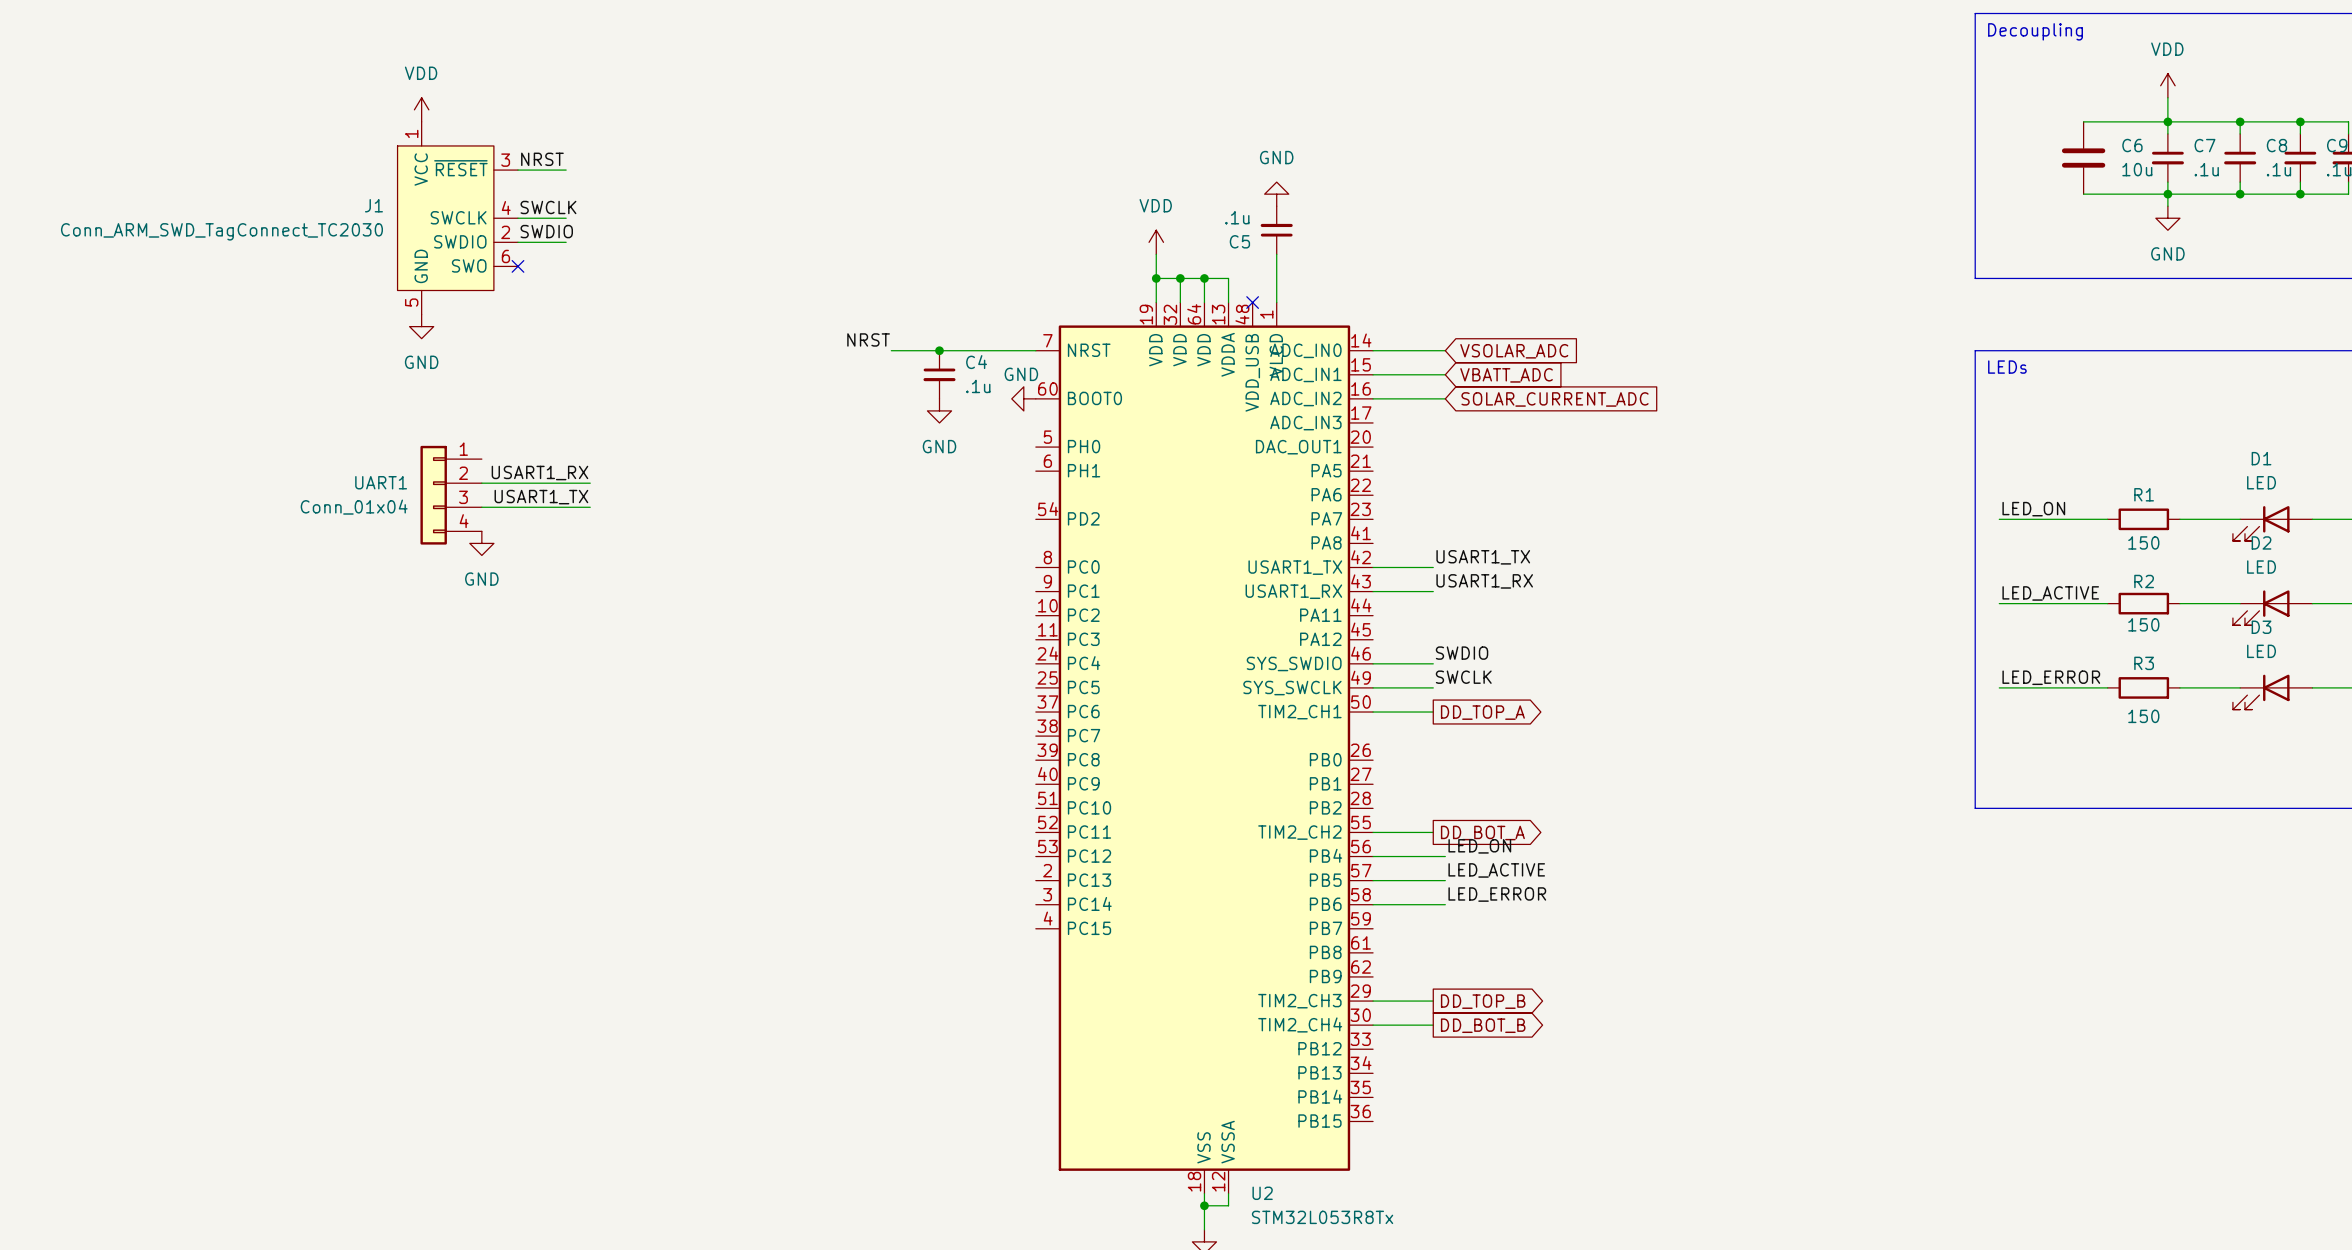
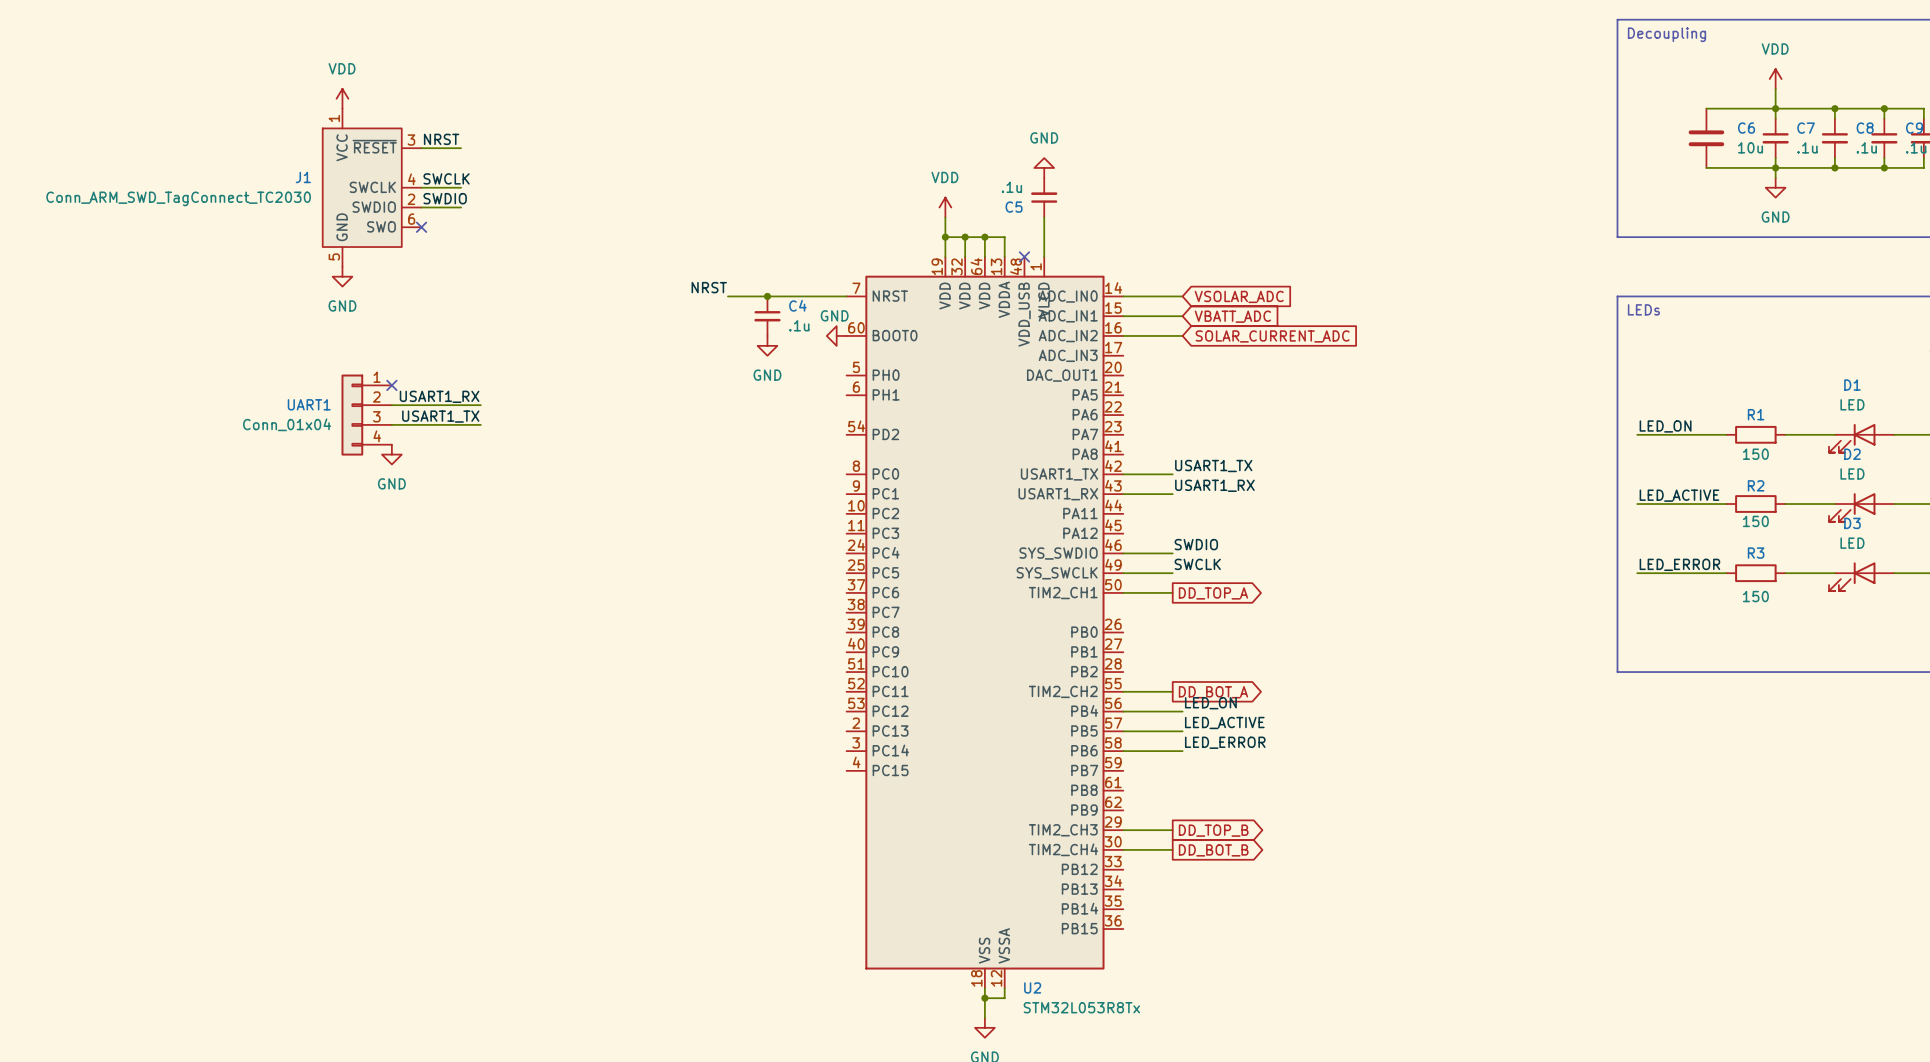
no-connect mark: none -> (391, 385)

